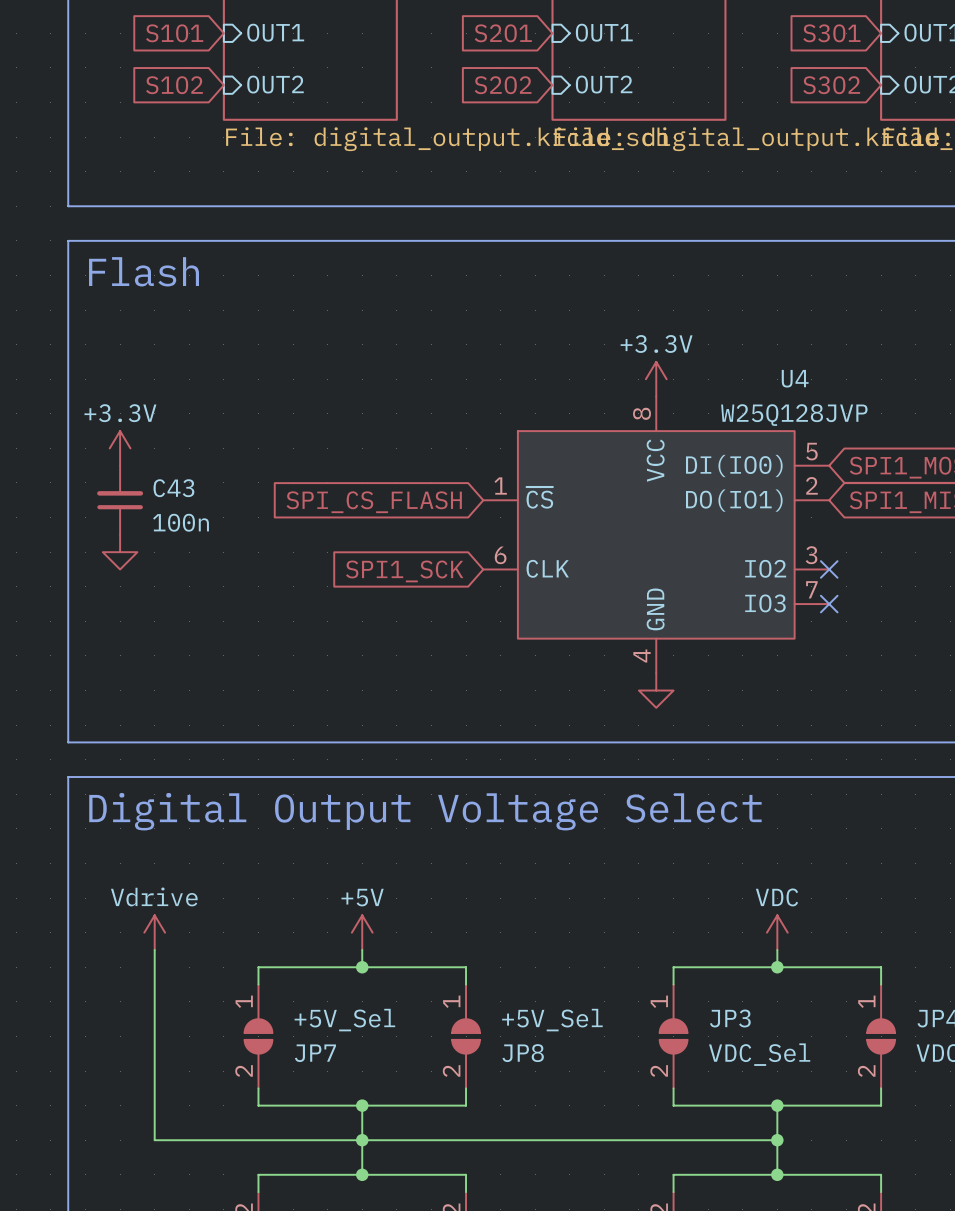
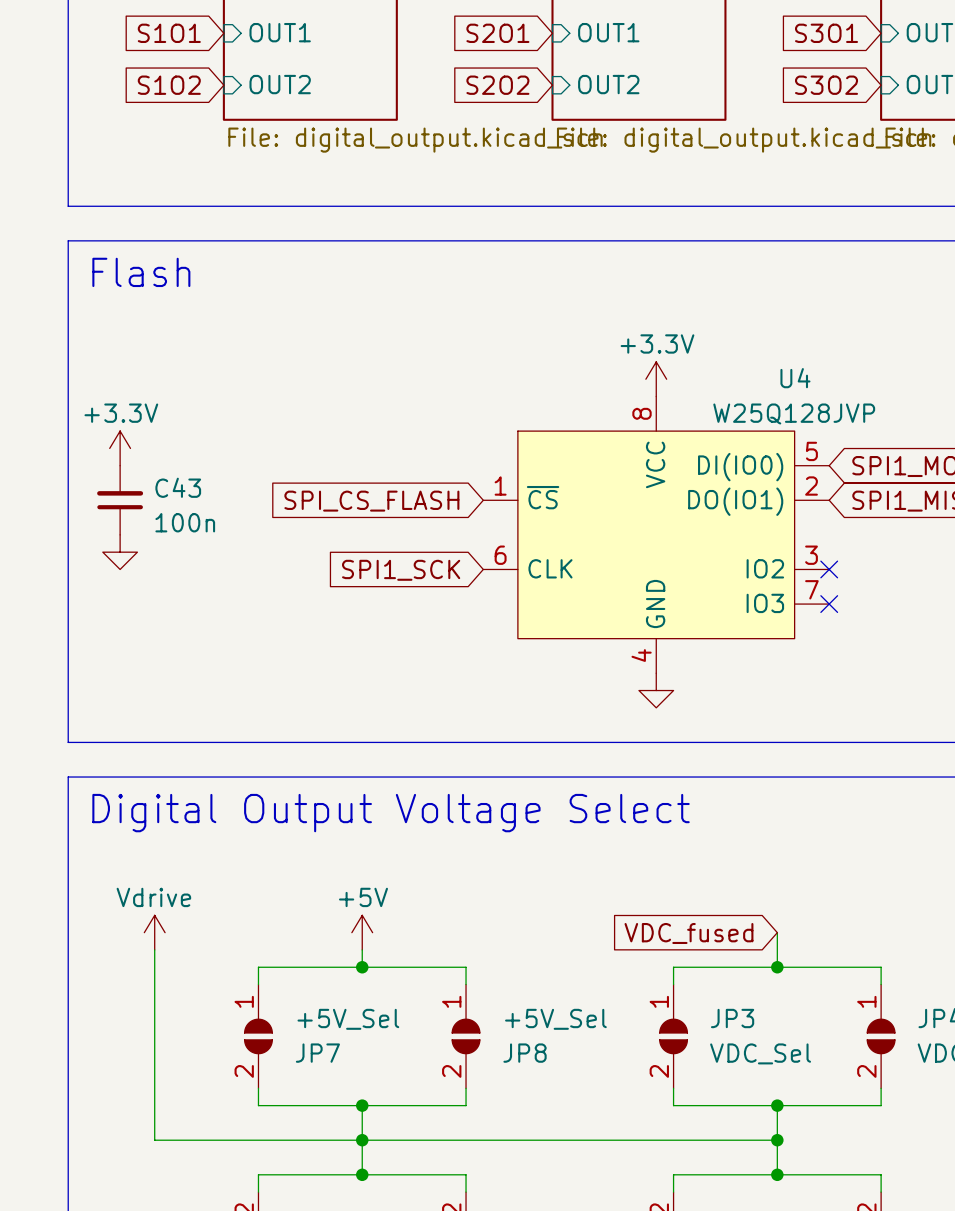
power symbol: VDC (777, 932) -> none
global label: none -> VDC_fused (688, 933)

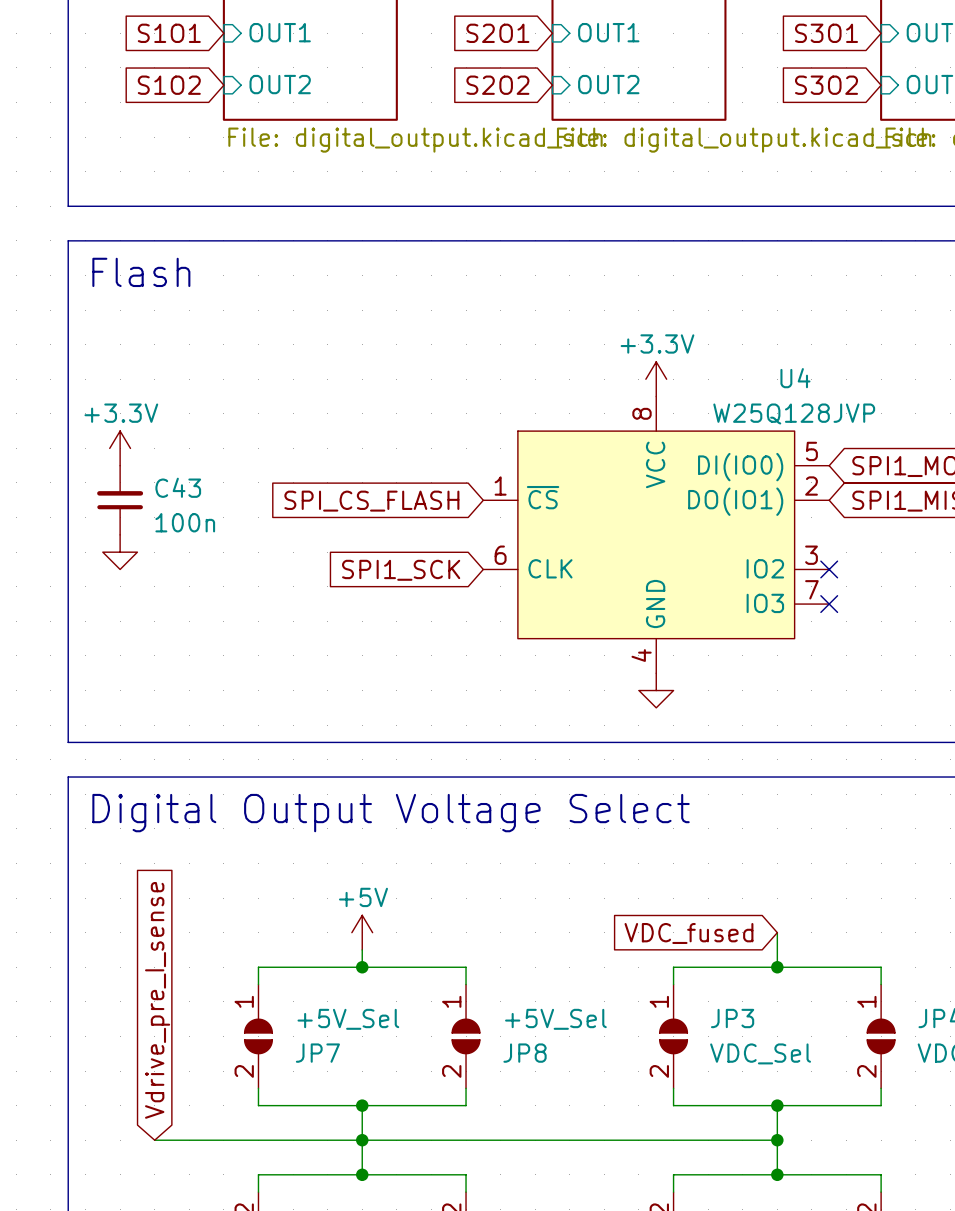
power symbol: Vdrive (154, 932) -> none
wire: (154, 949) (154, 1140) -> none
global label: none -> Vdrive_pre_I_sense (157, 1000)

